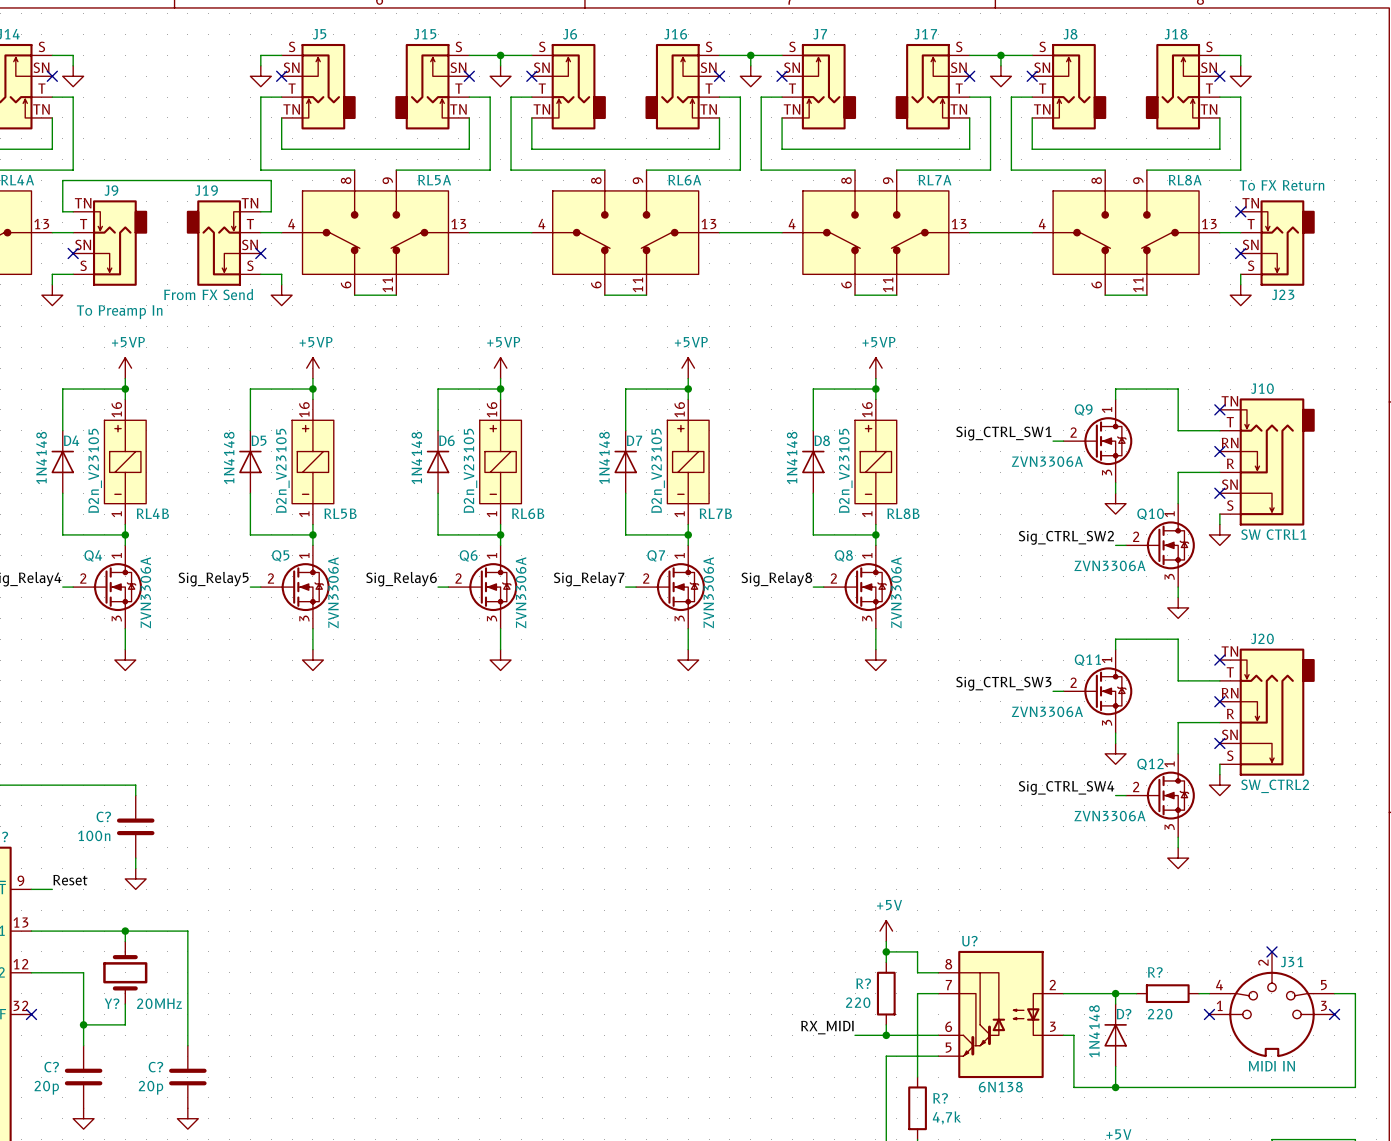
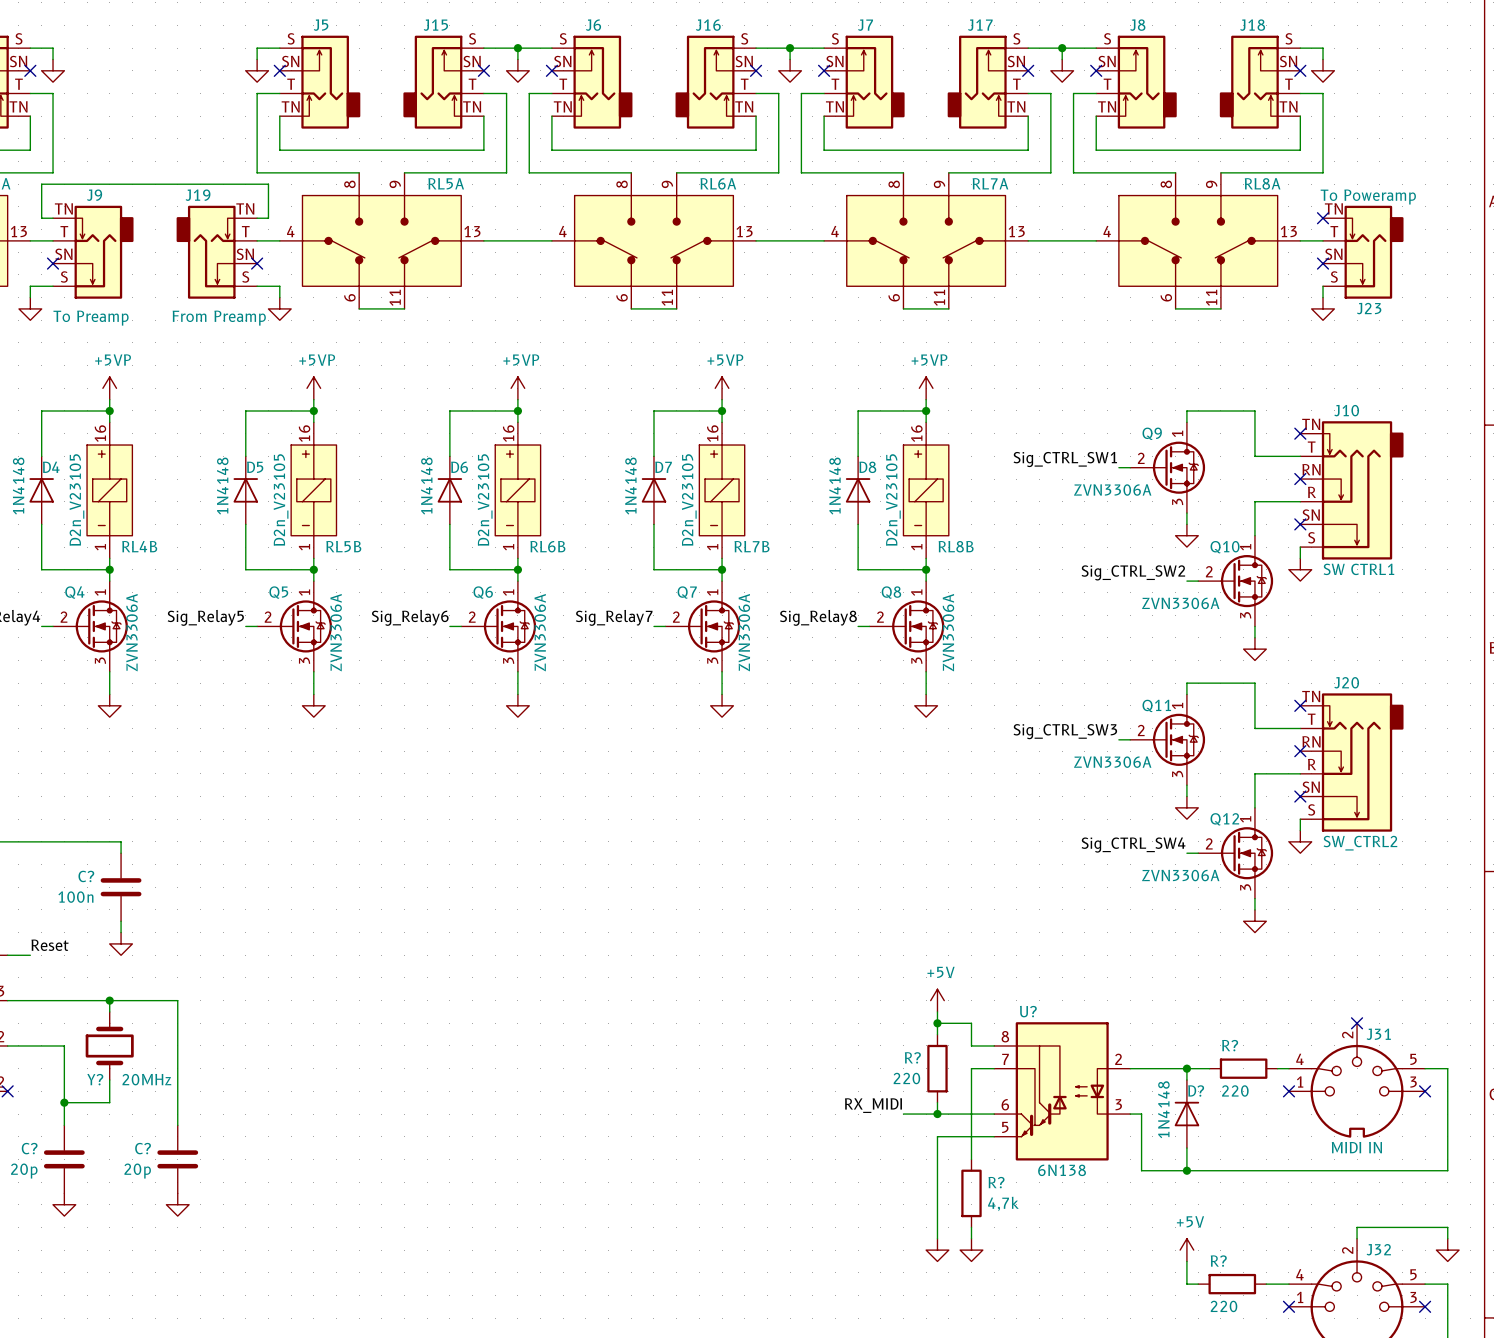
J23 value: To FX Return (1282, 185) -> To Poweramp (1368, 197)
J19 value: From FX Send (208, 294) -> From Preamp (219, 318)
J9 value: To Preamp In (119, 312) -> To Preamp (91, 318)

